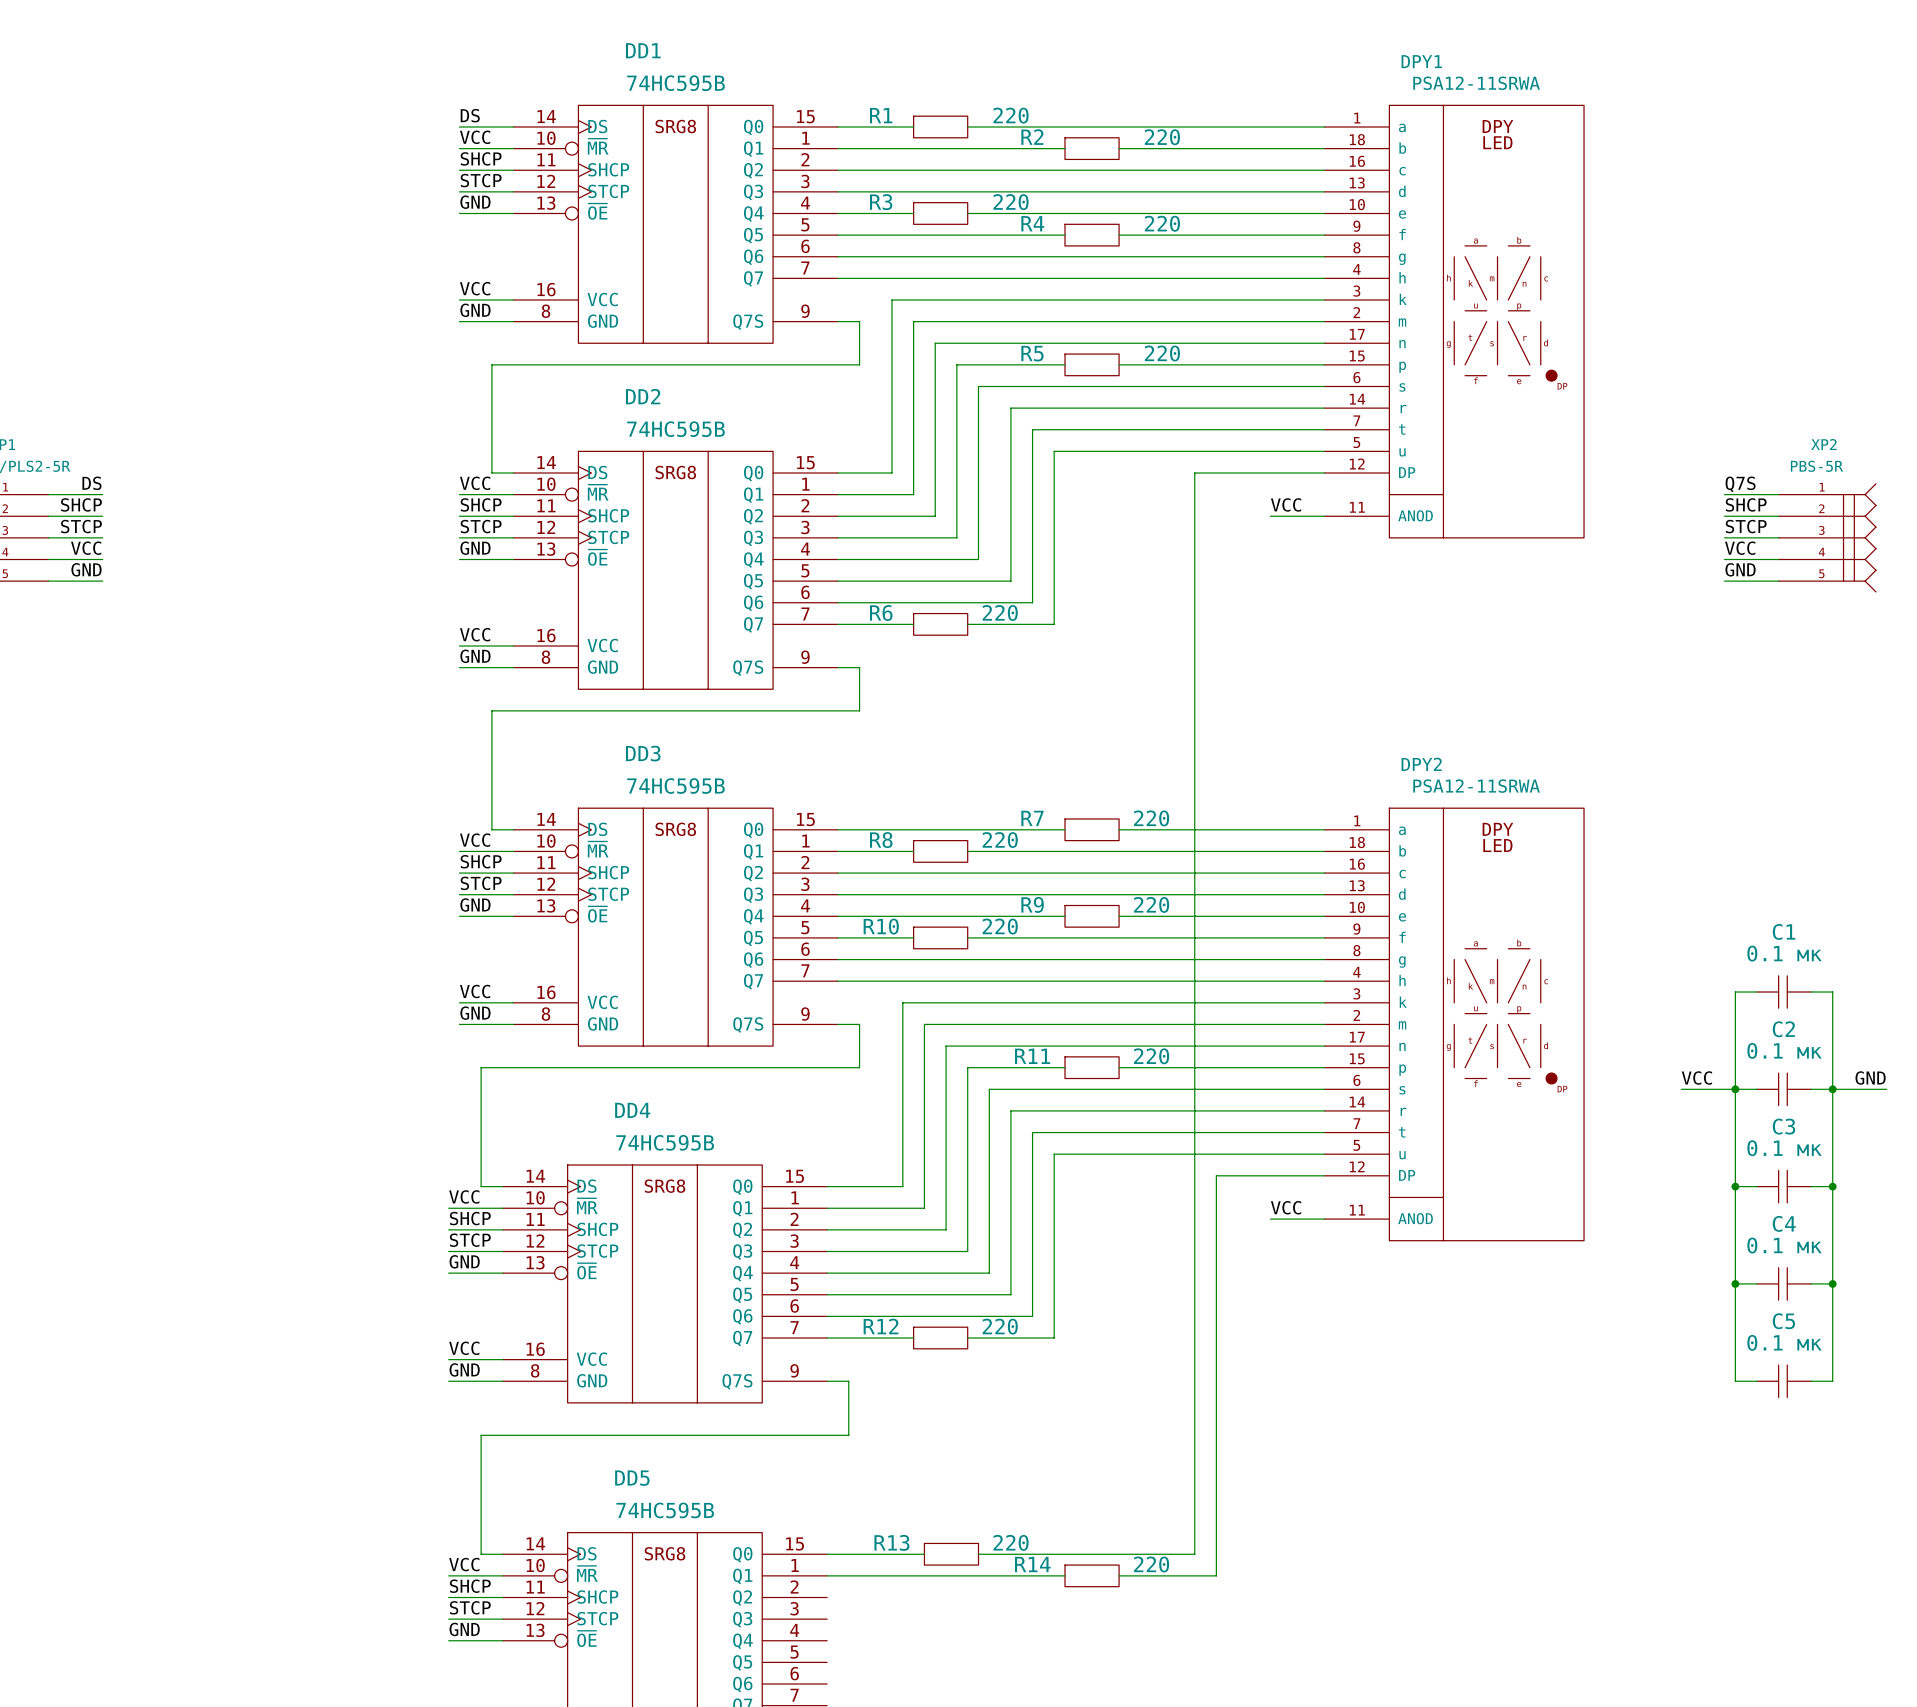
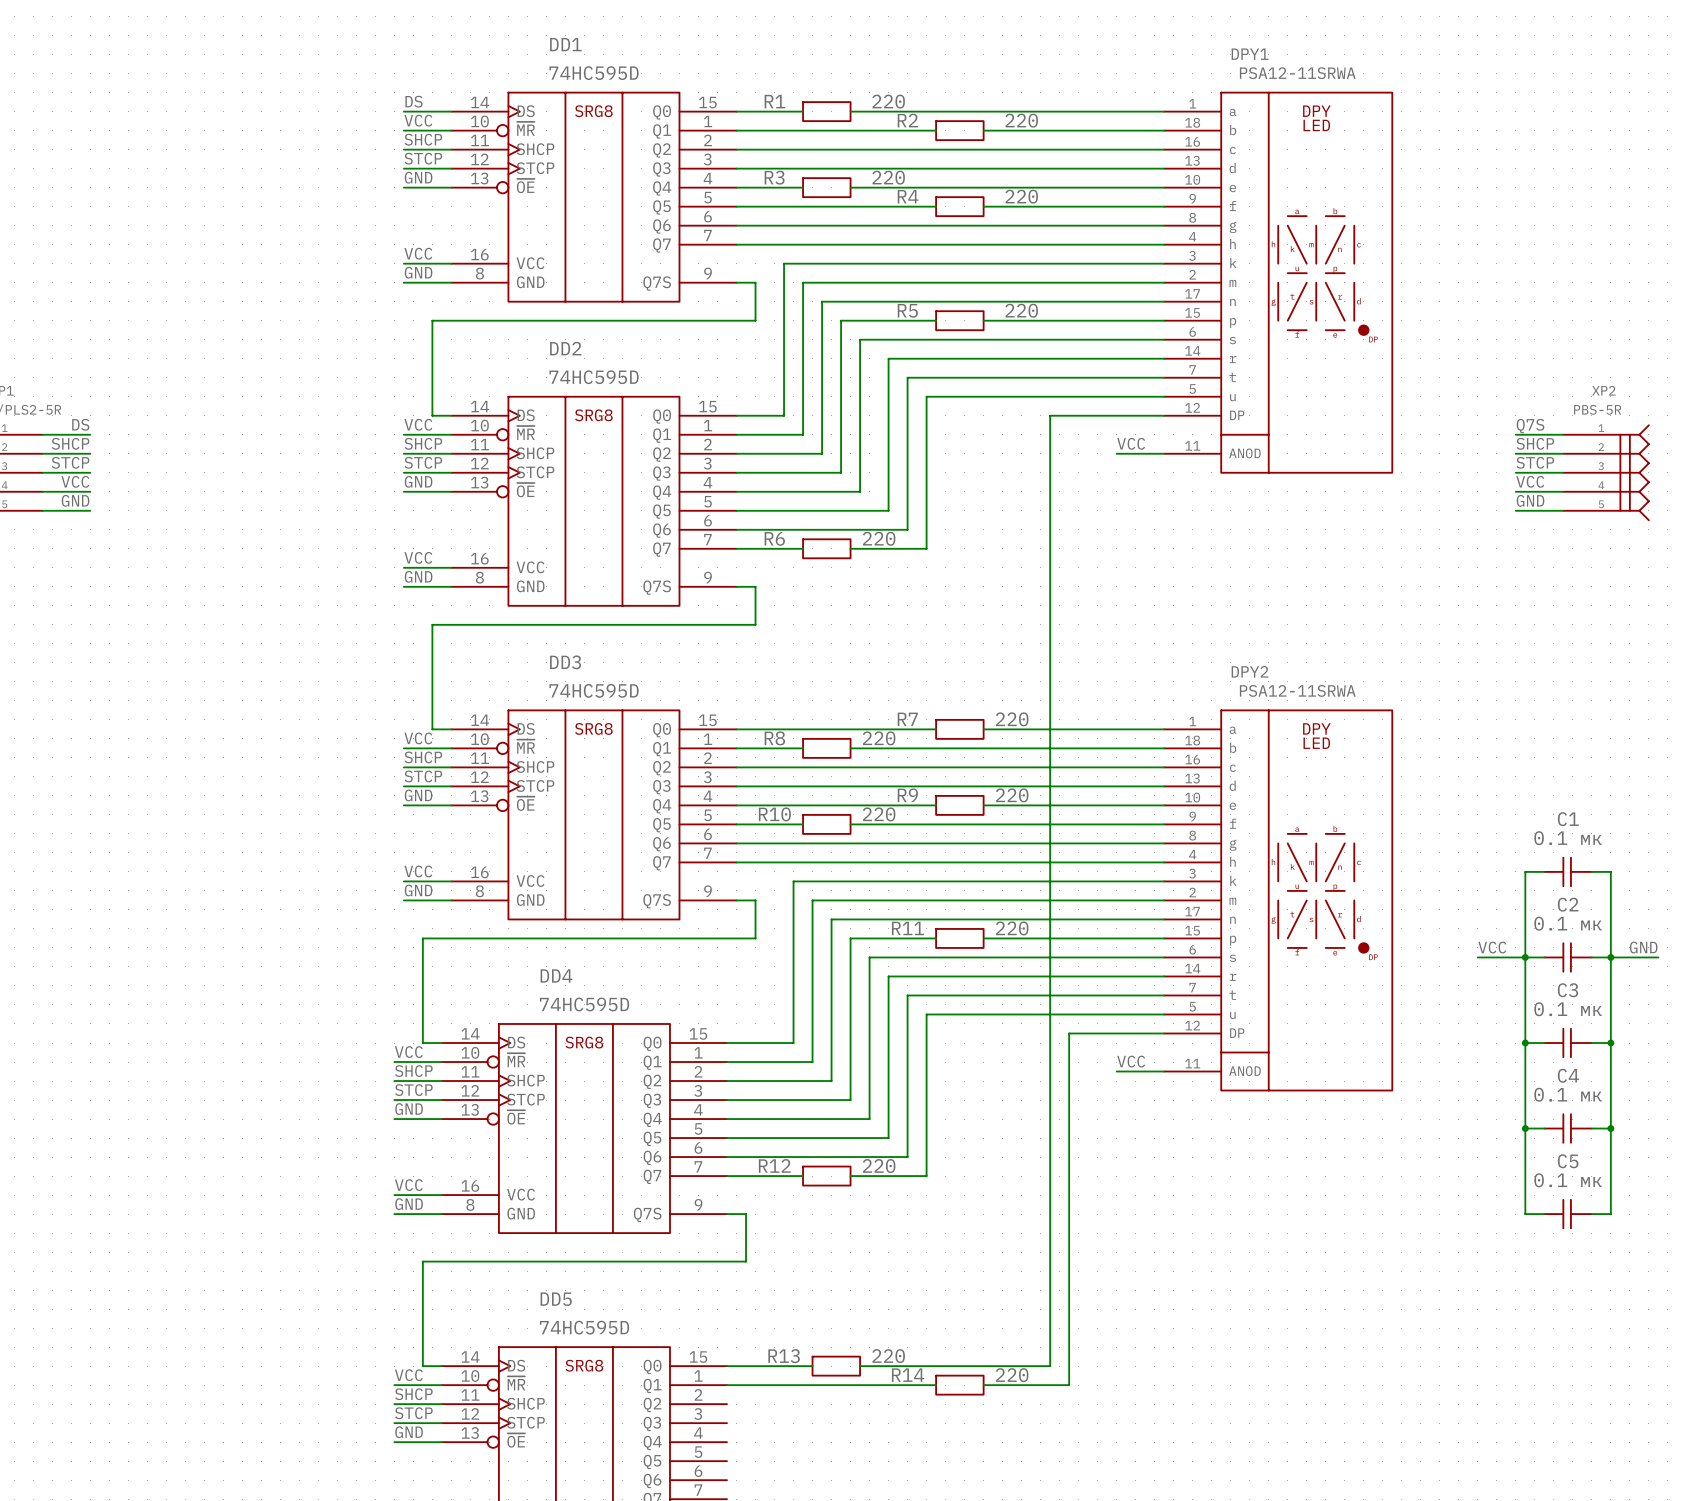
DD1 value: 74HC595B (675, 83) -> 74HC595D (594, 73)
DD2 value: 74HC595B (675, 429) -> 74HC595D (594, 377)
DD3 value: 74HC595B (675, 786) -> 74HC595D (594, 690)
DD4 value: 74HC595B (665, 1142) -> 74HC595D (584, 1004)
DD5 value: 74HC595B (665, 1510) -> 74HC595D (584, 1327)

